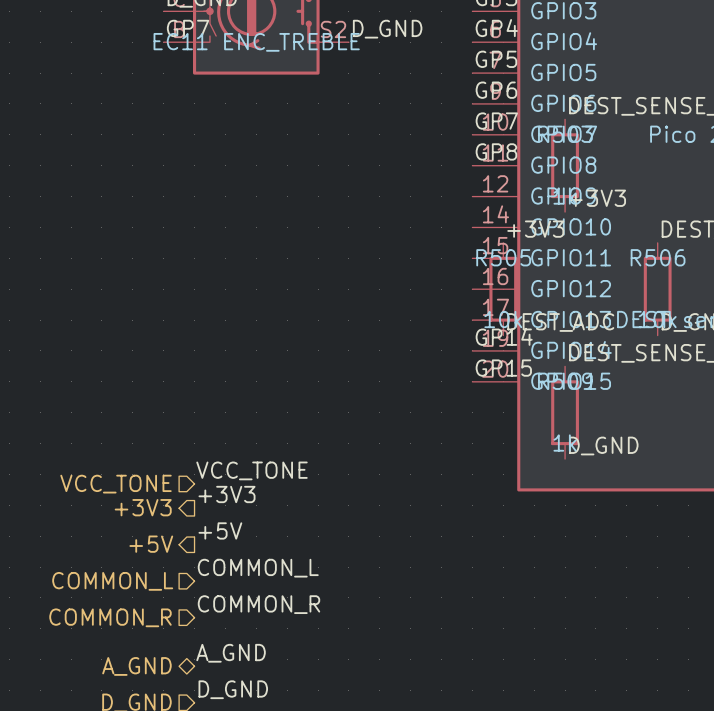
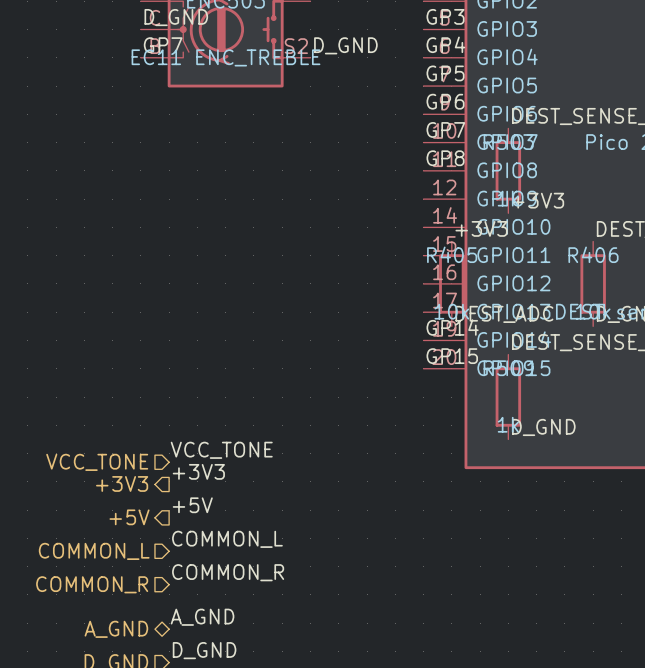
R505 name: R505 (503, 257) -> R405 (452, 254)
R506 name: R506 (658, 257) -> R406 (593, 254)

